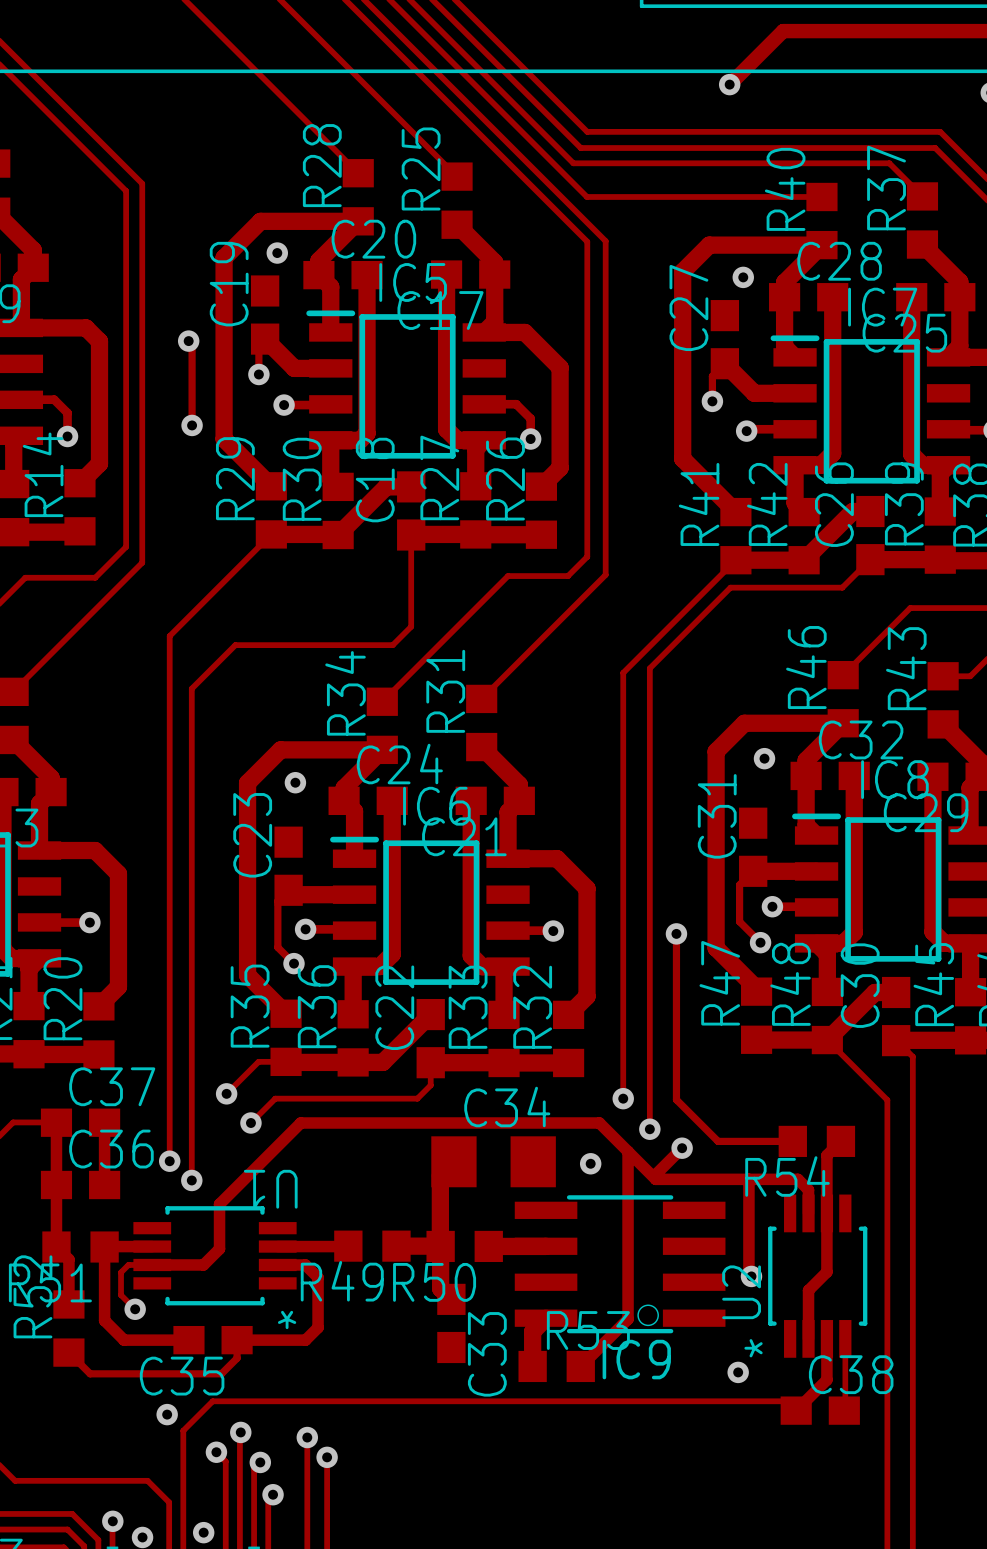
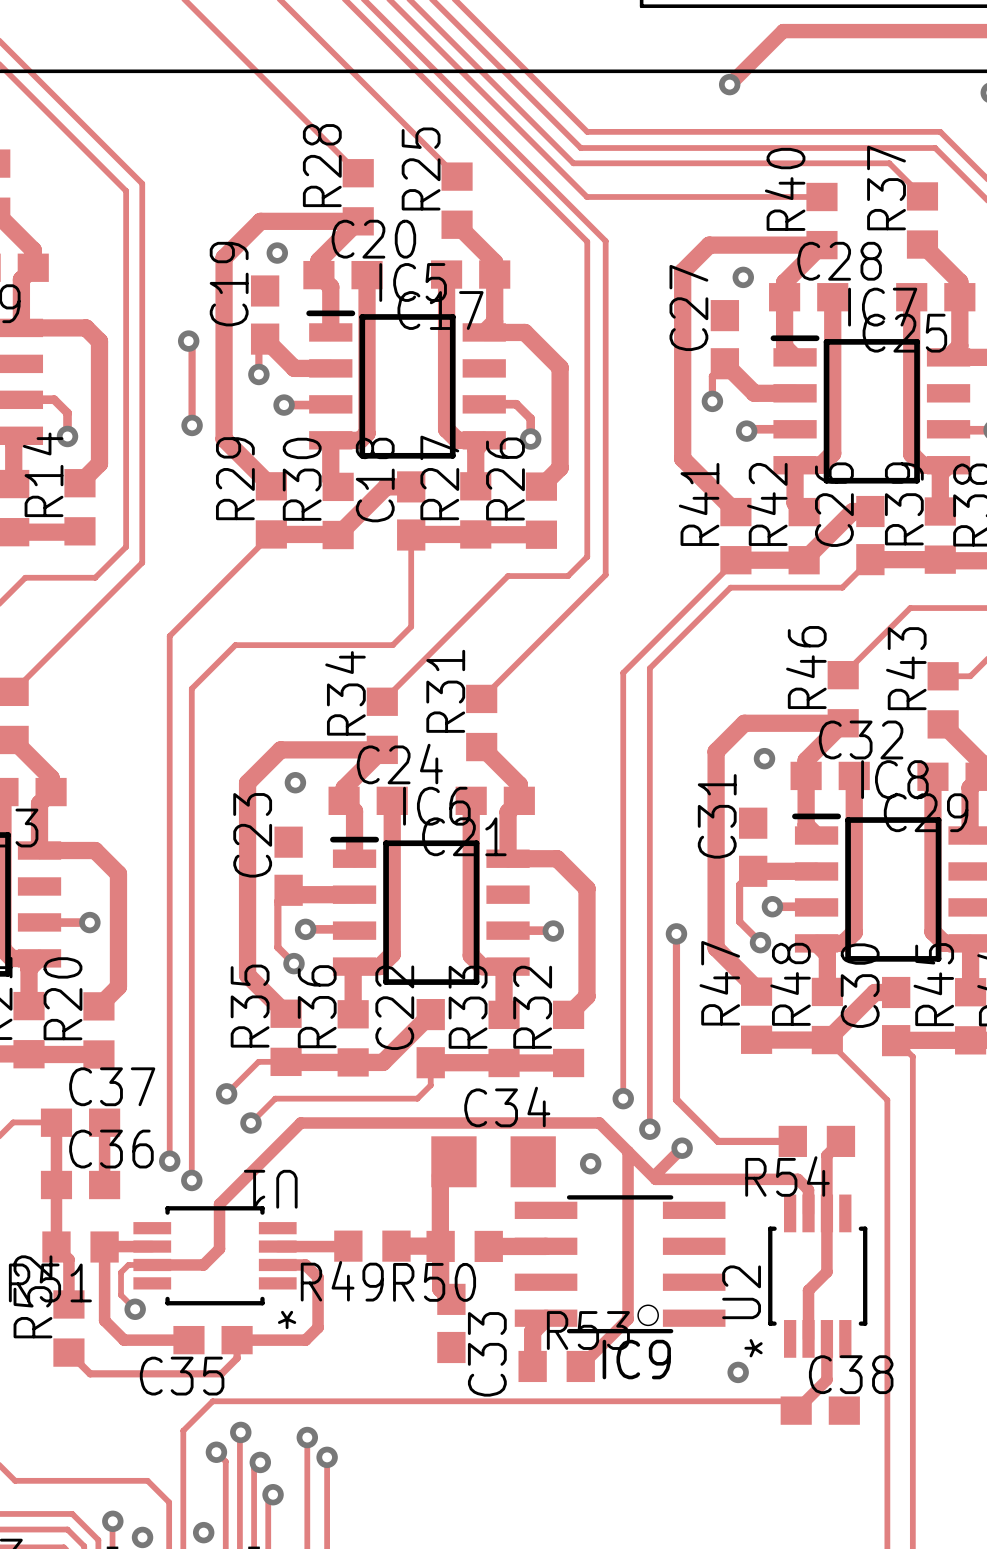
track: (748, 1179) (748, 1273) (751, 1276) -> none
via: (751, 1276) -> none
track: (845, 1338) (844, 1410) -> none
via: (167, 1414) -> none

